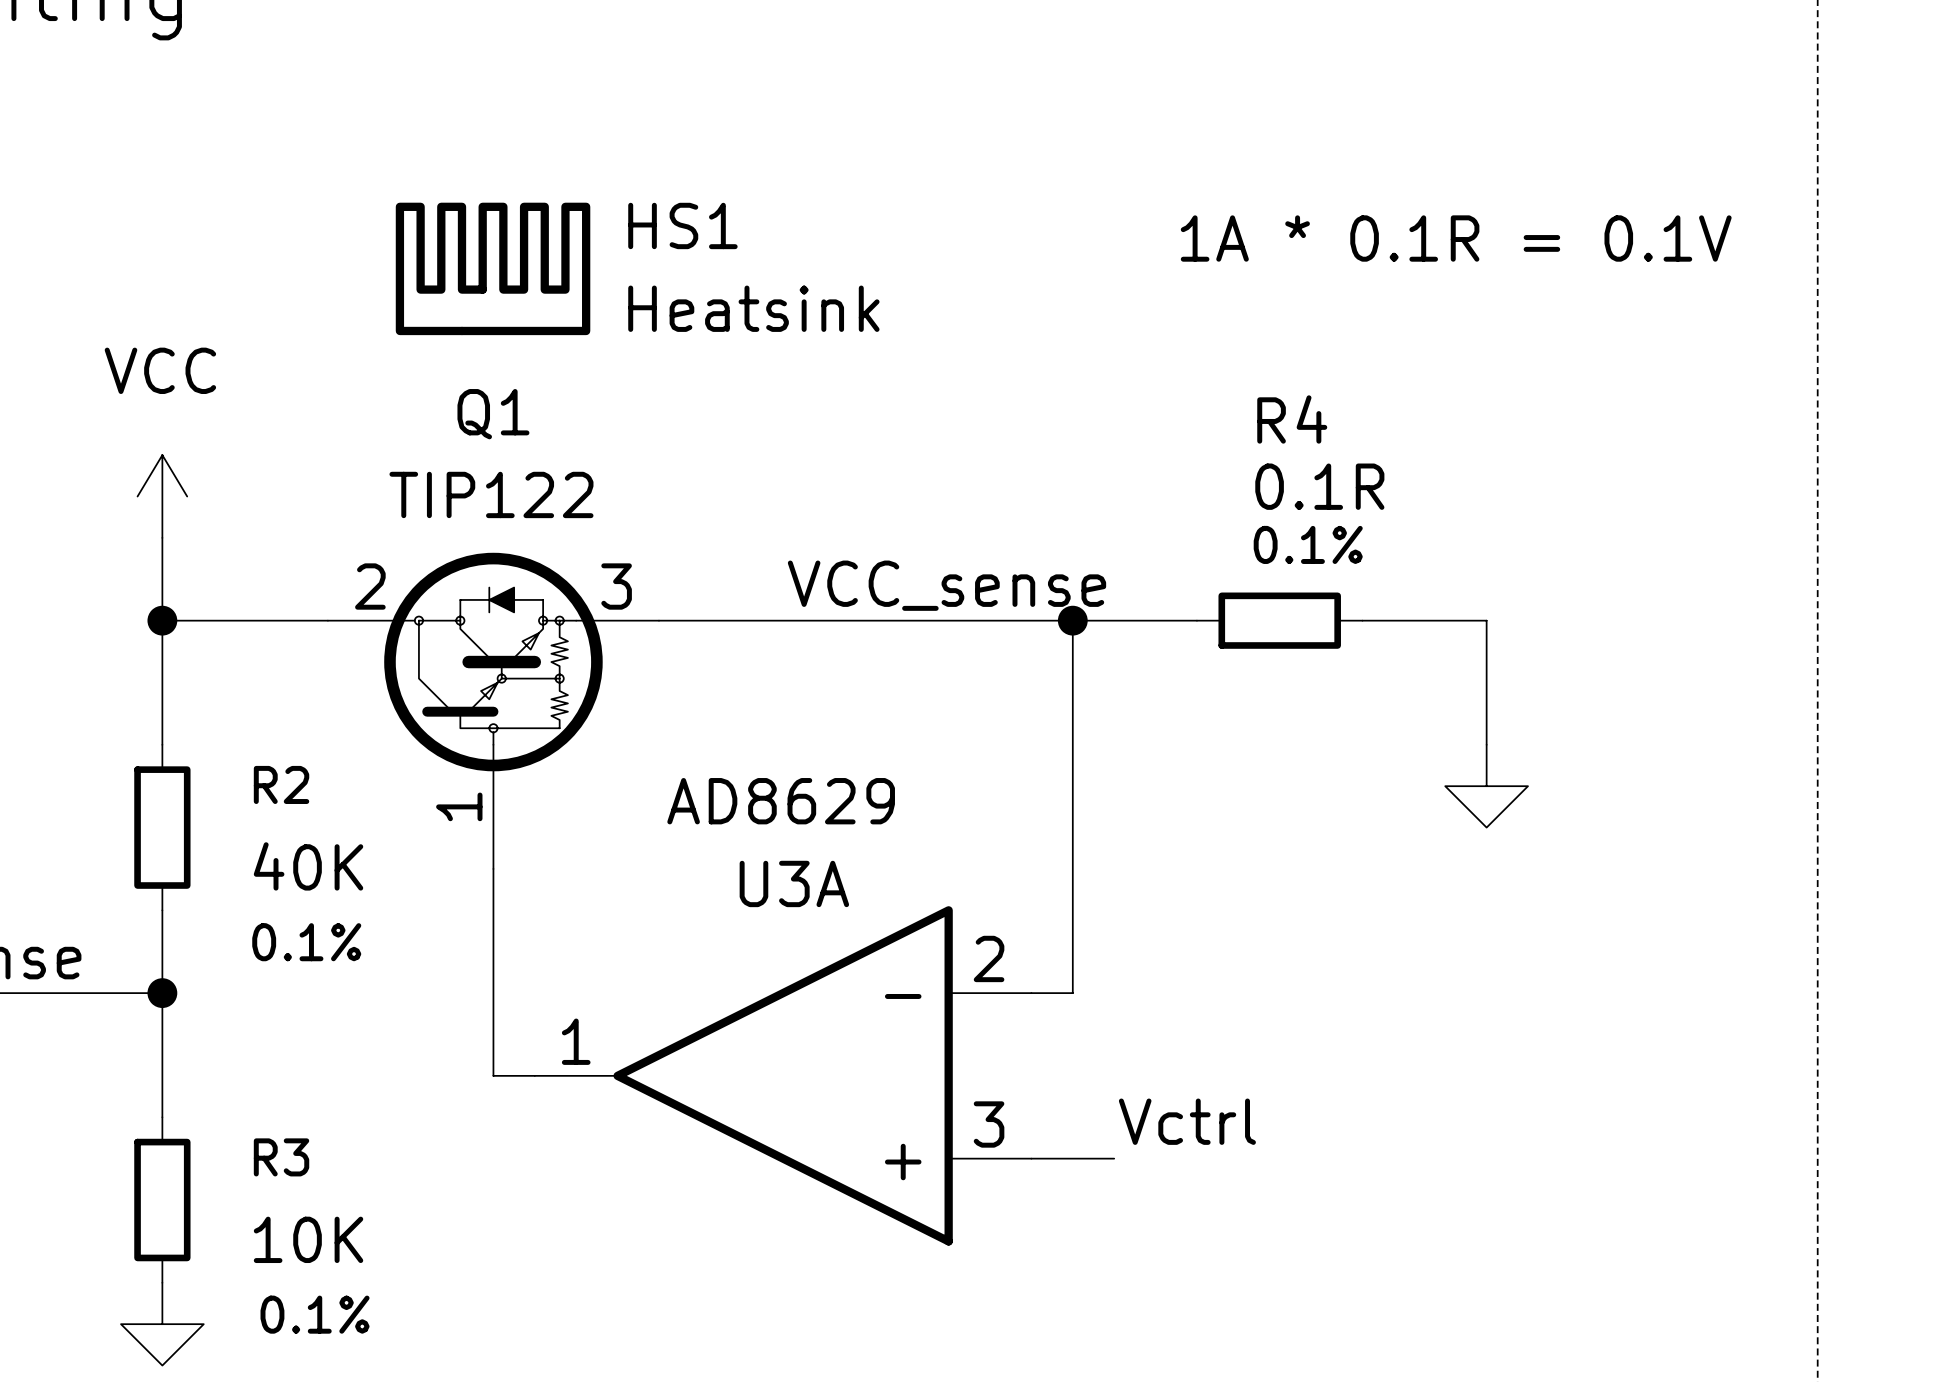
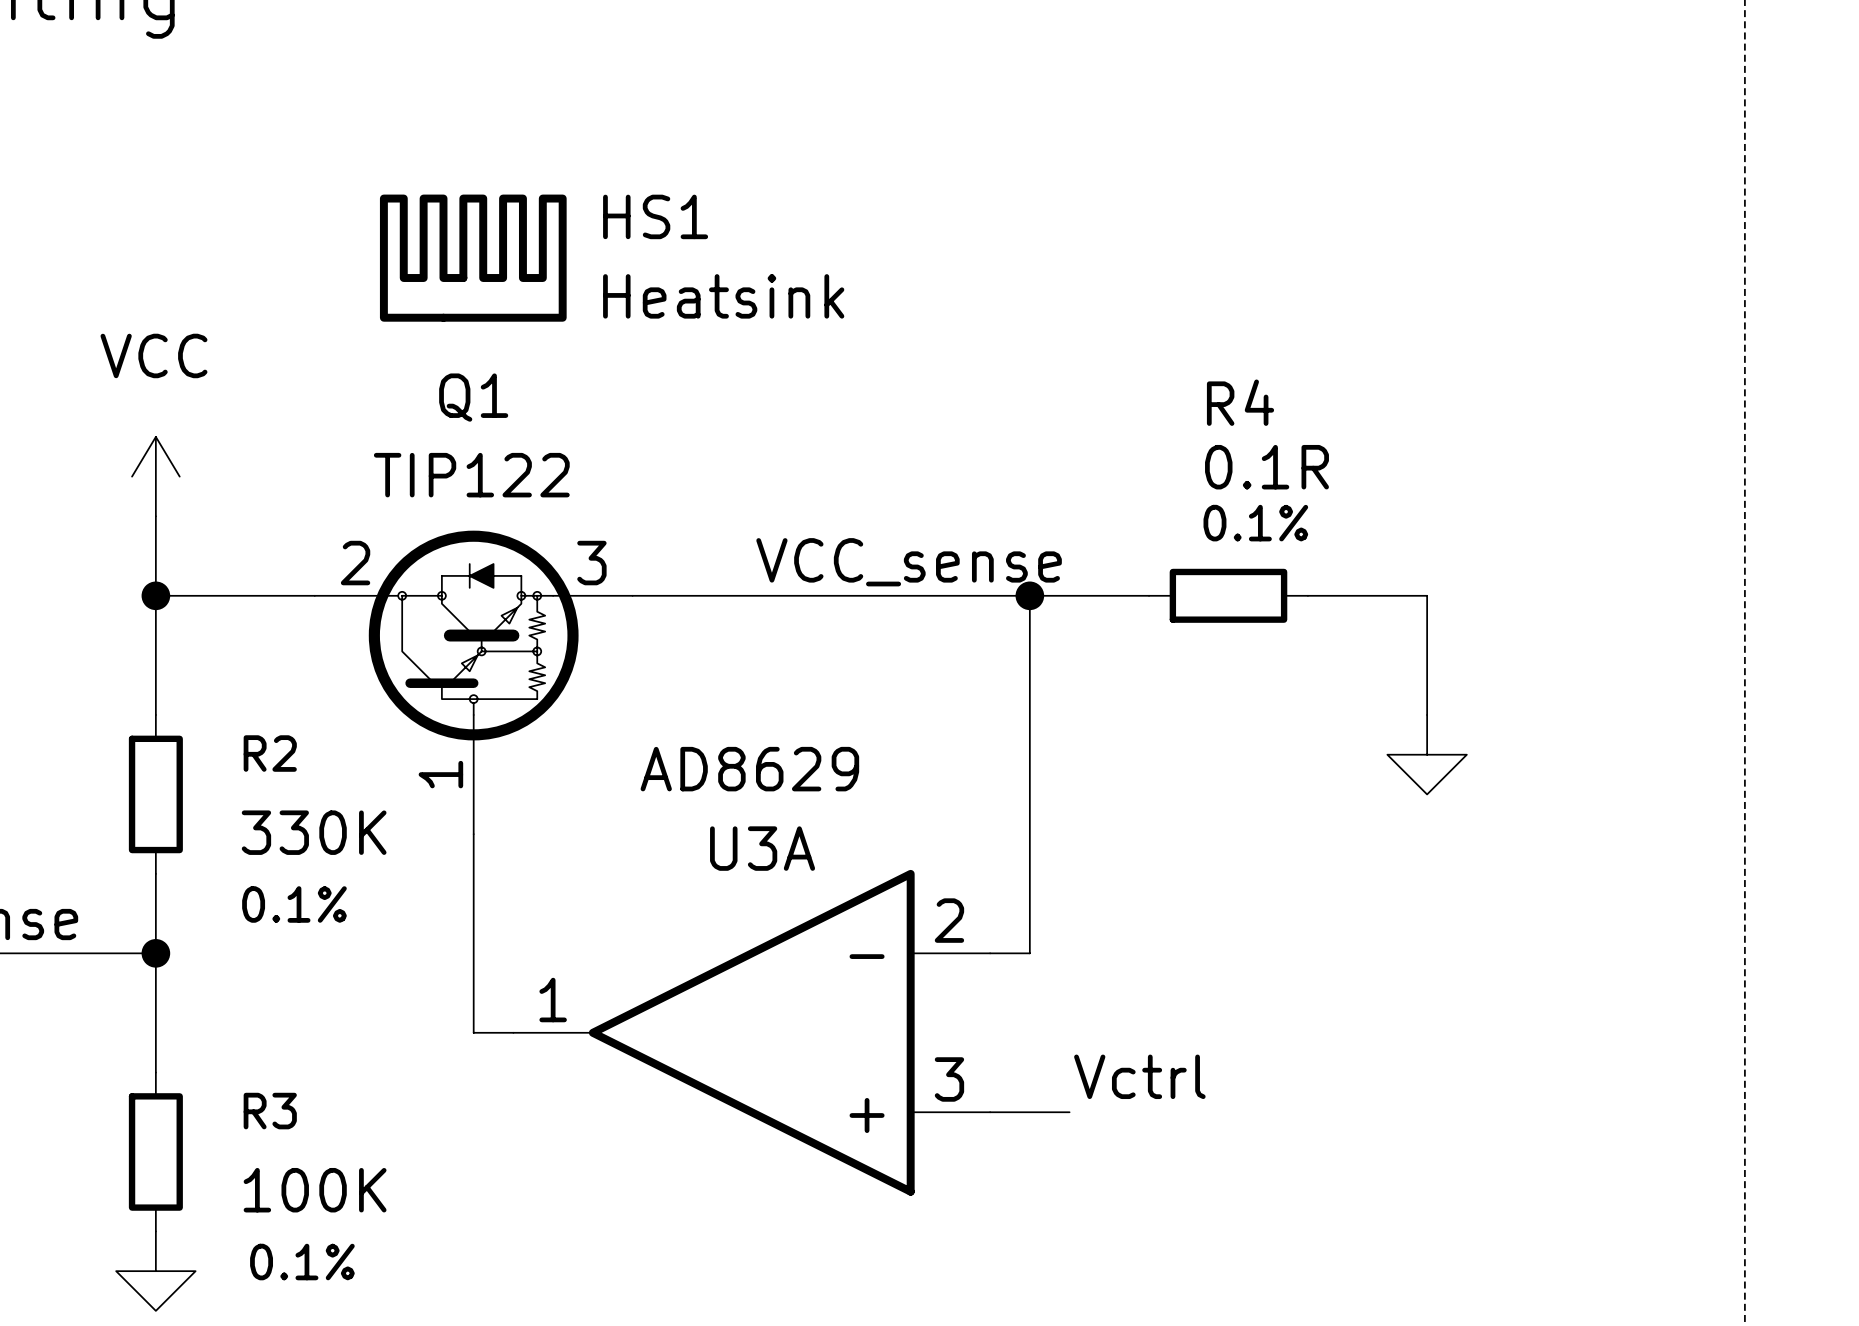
text: 1A * 0.1R = 0.1V (1456, 238) -> none
R2 value: 40K (308, 866) -> 330K (314, 832)
R3 value: 10K (308, 1239) -> 100K (315, 1190)

